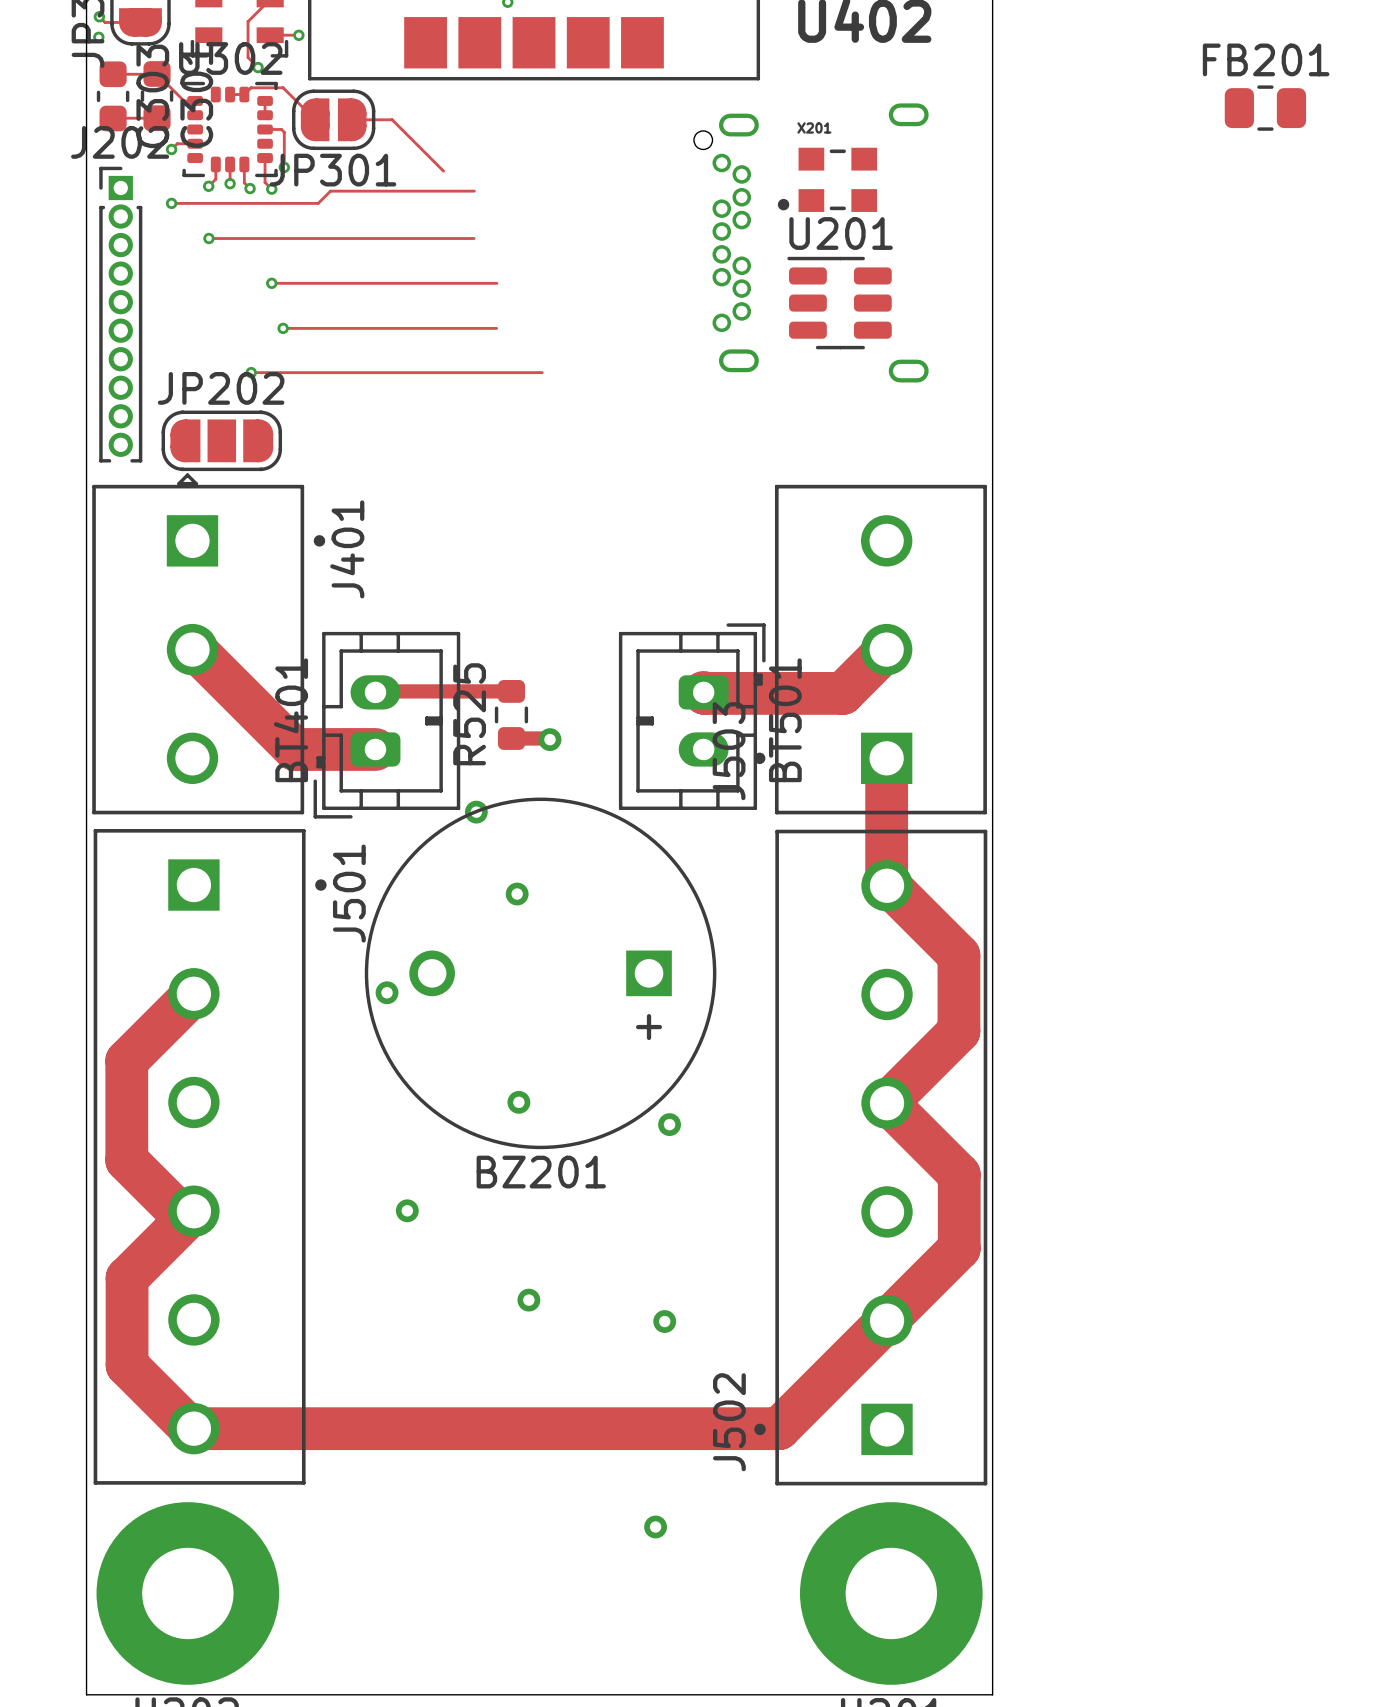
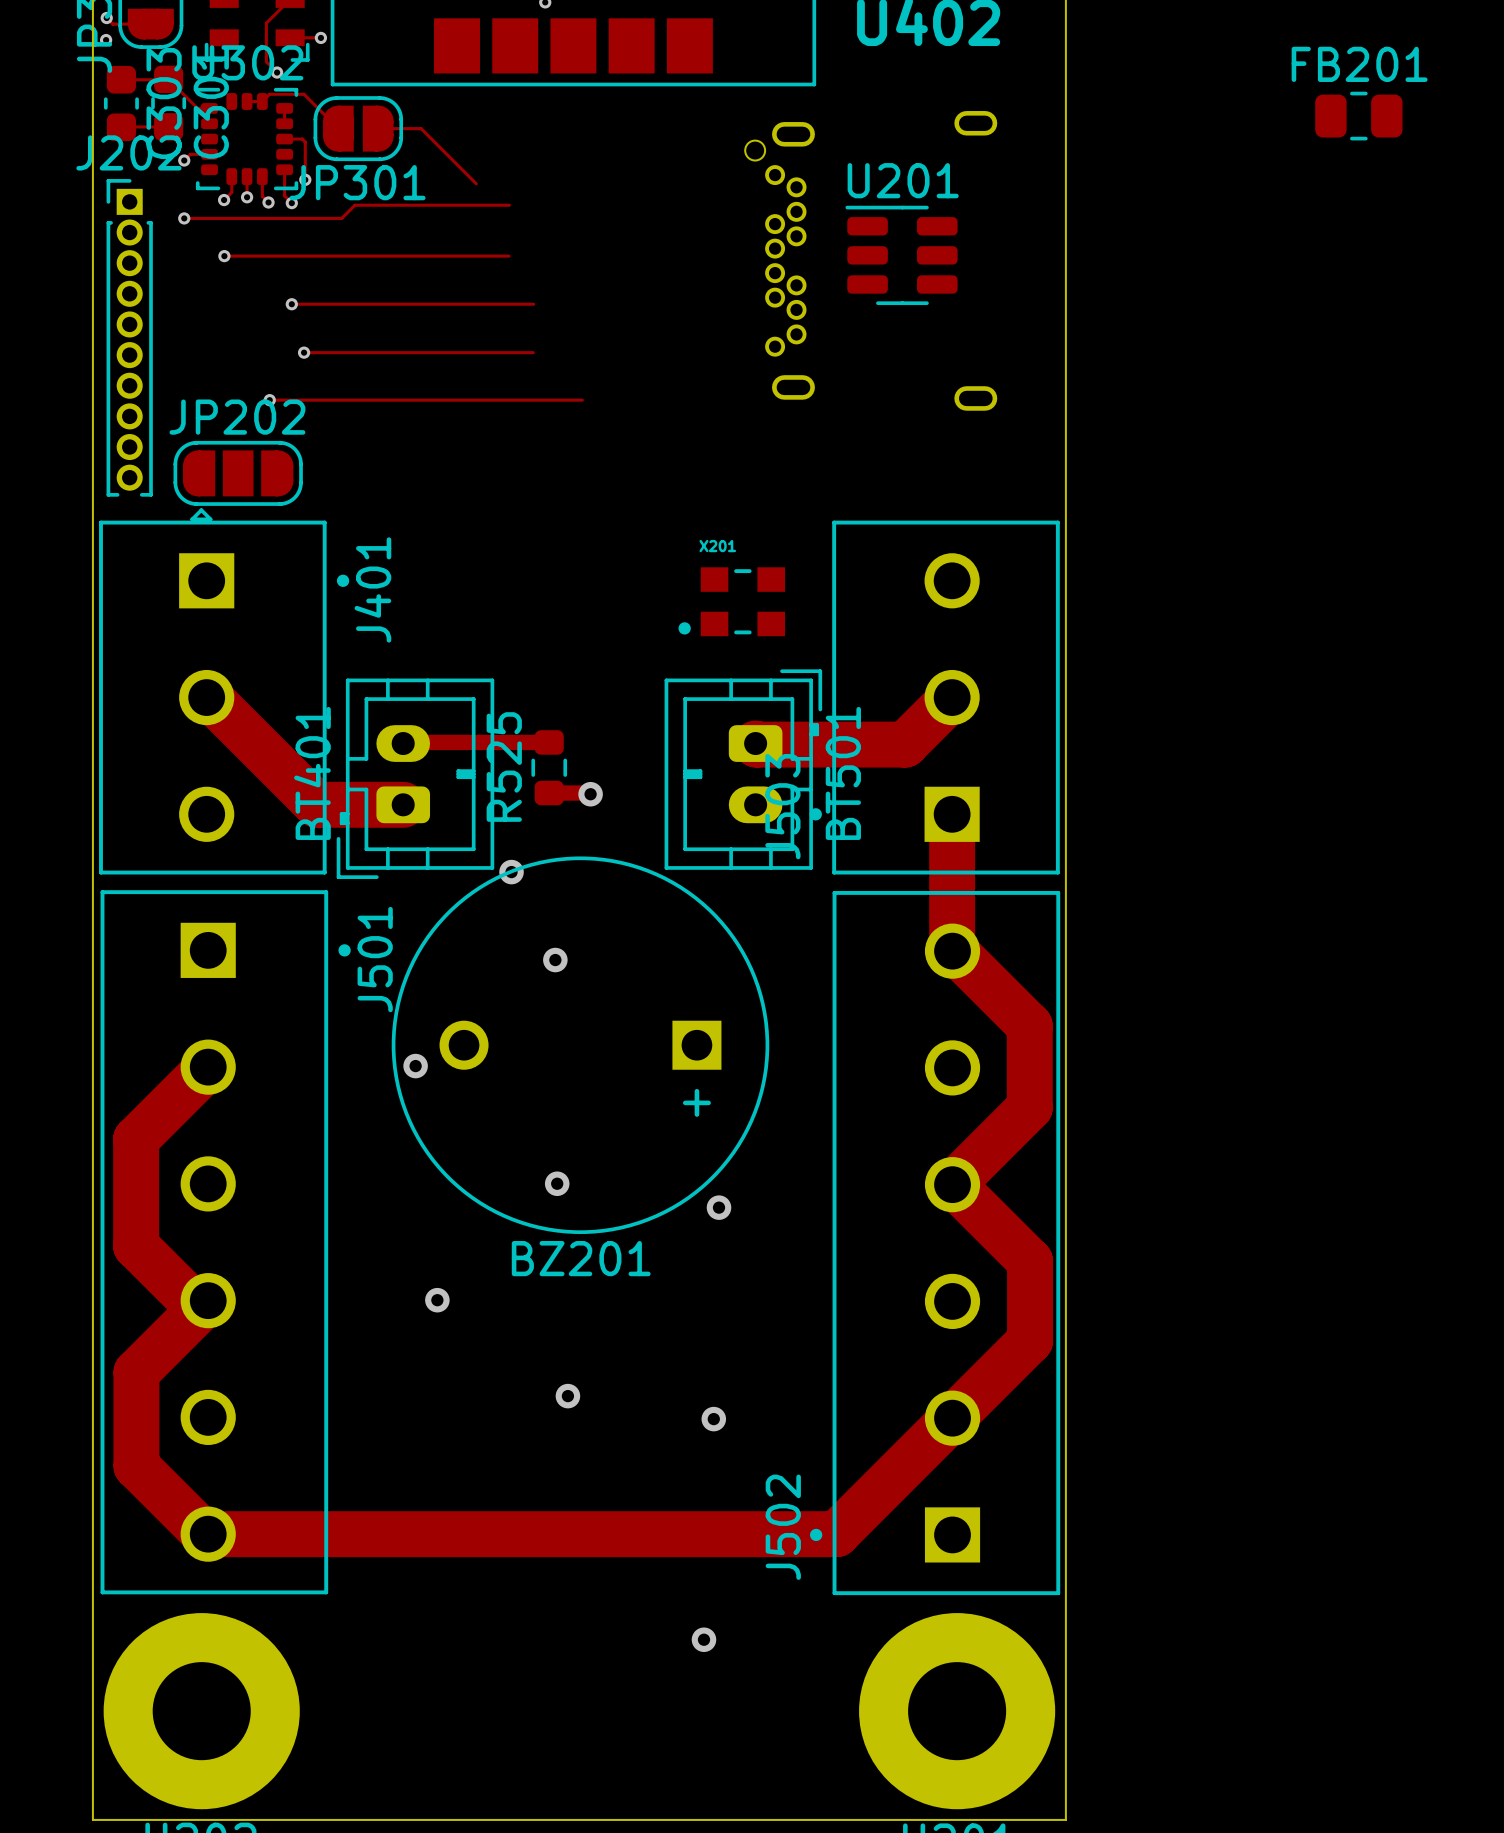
X201 position: (827, 179) -> (731, 601)
U201 position: (839, 303) -> (901, 255)

